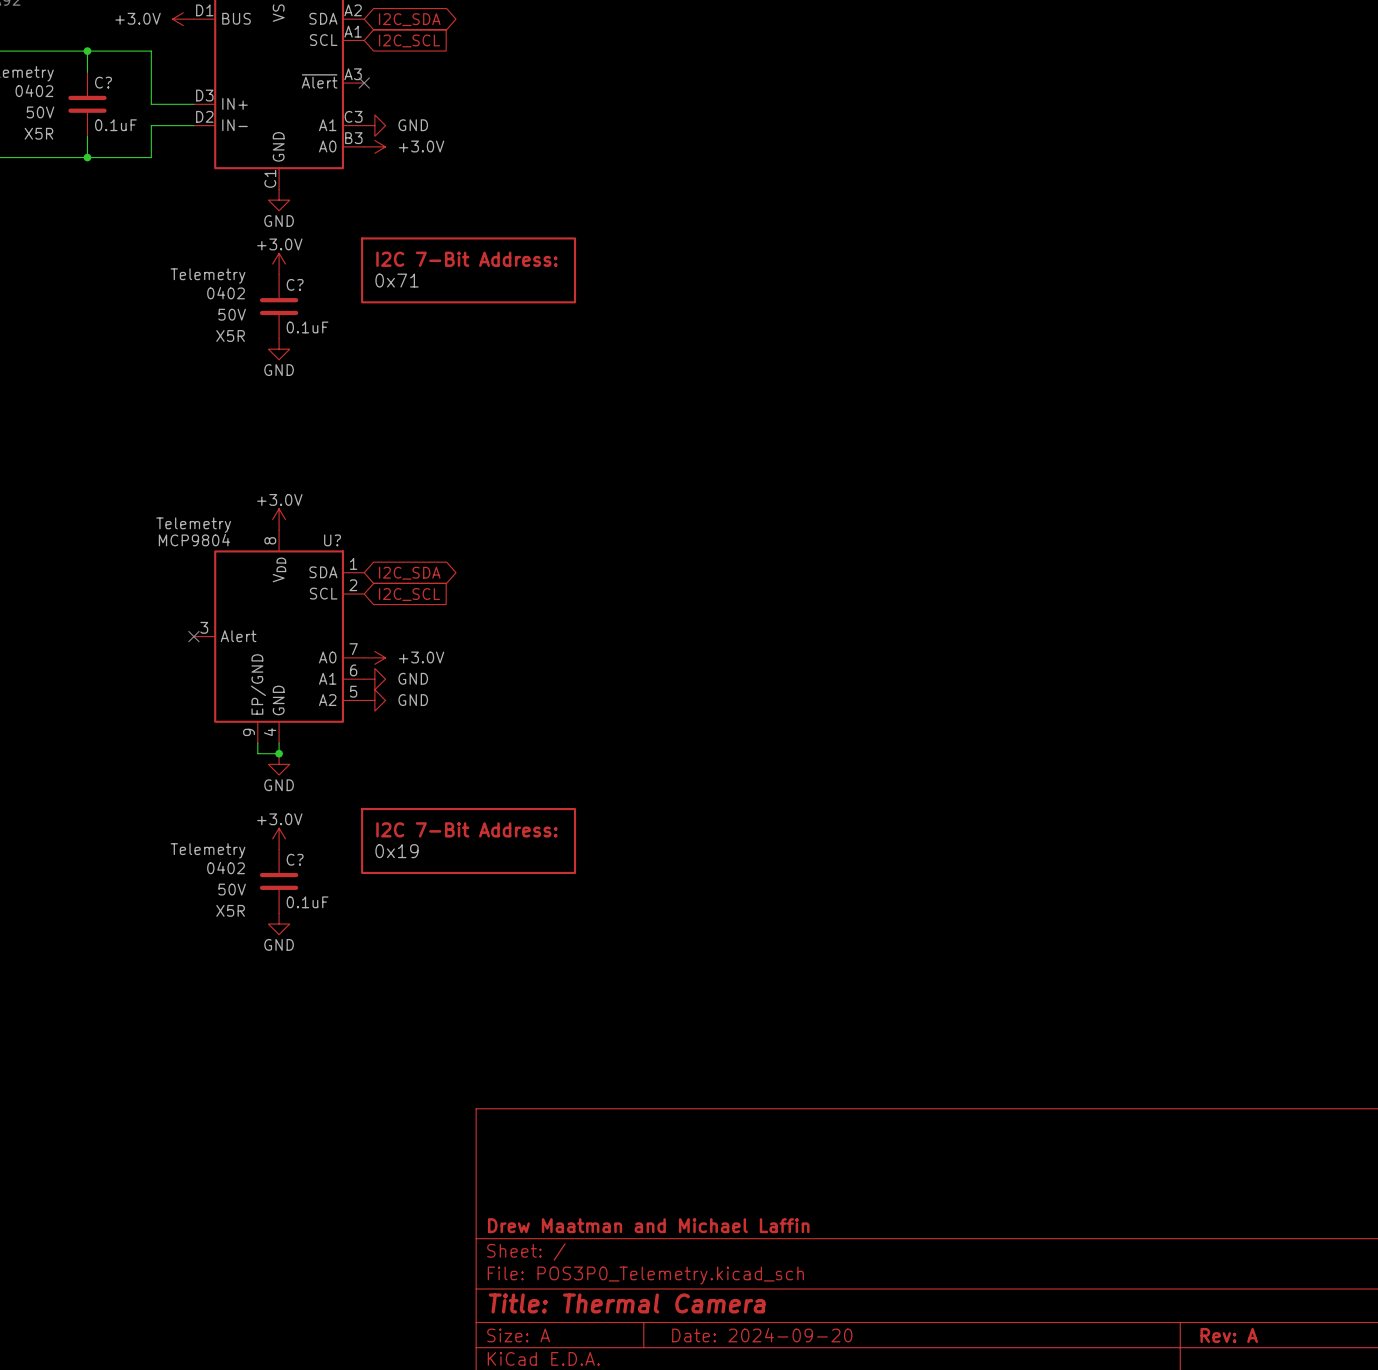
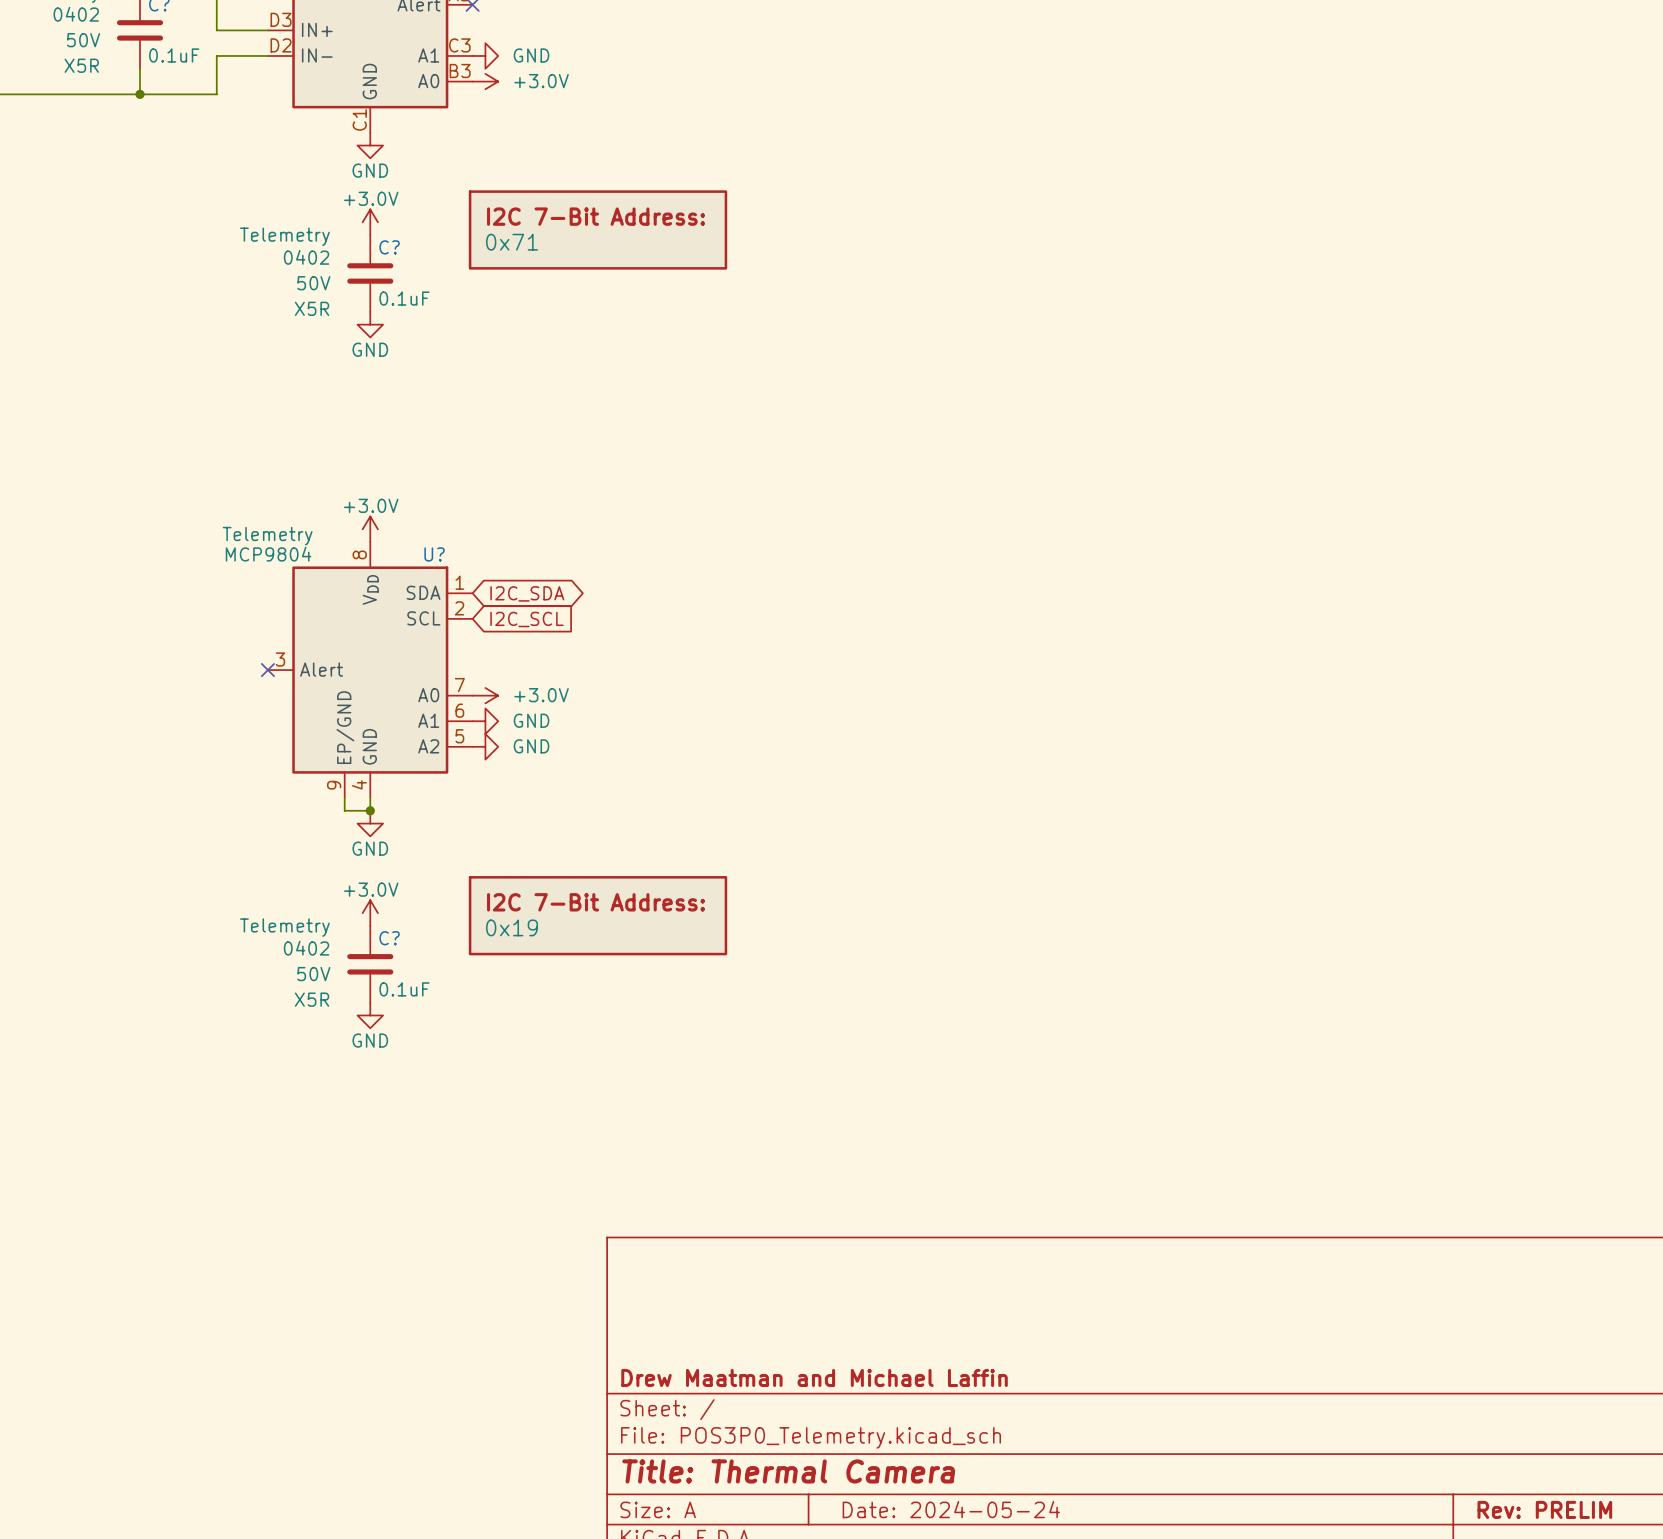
title block: Date: 2024-09-20 (762, 1335) -> Date: 2024-05-24 (951, 1509)
title block: Rev: A (1229, 1335) -> Rev: PRELIM (1544, 1509)

